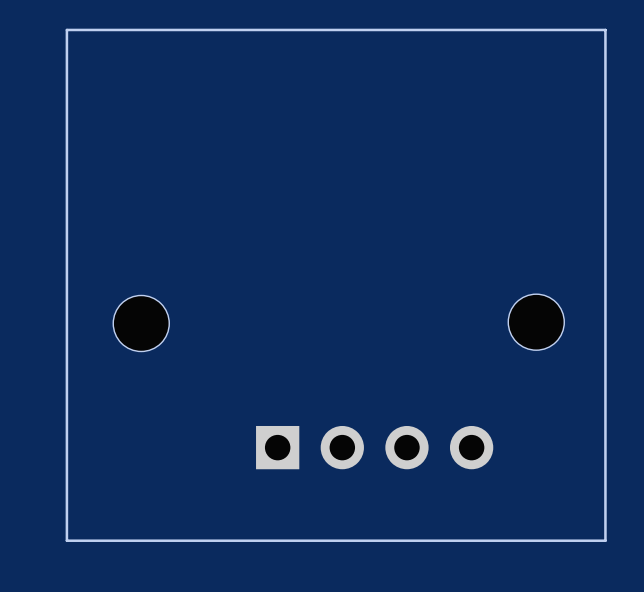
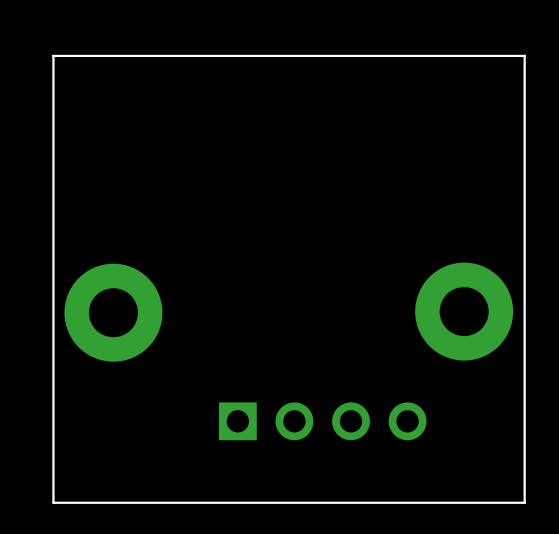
part footprint: [508, 294, 565, 351] -> [415, 262, 514, 361]
part footprint: [113, 295, 170, 352] -> [64, 263, 163, 362]

